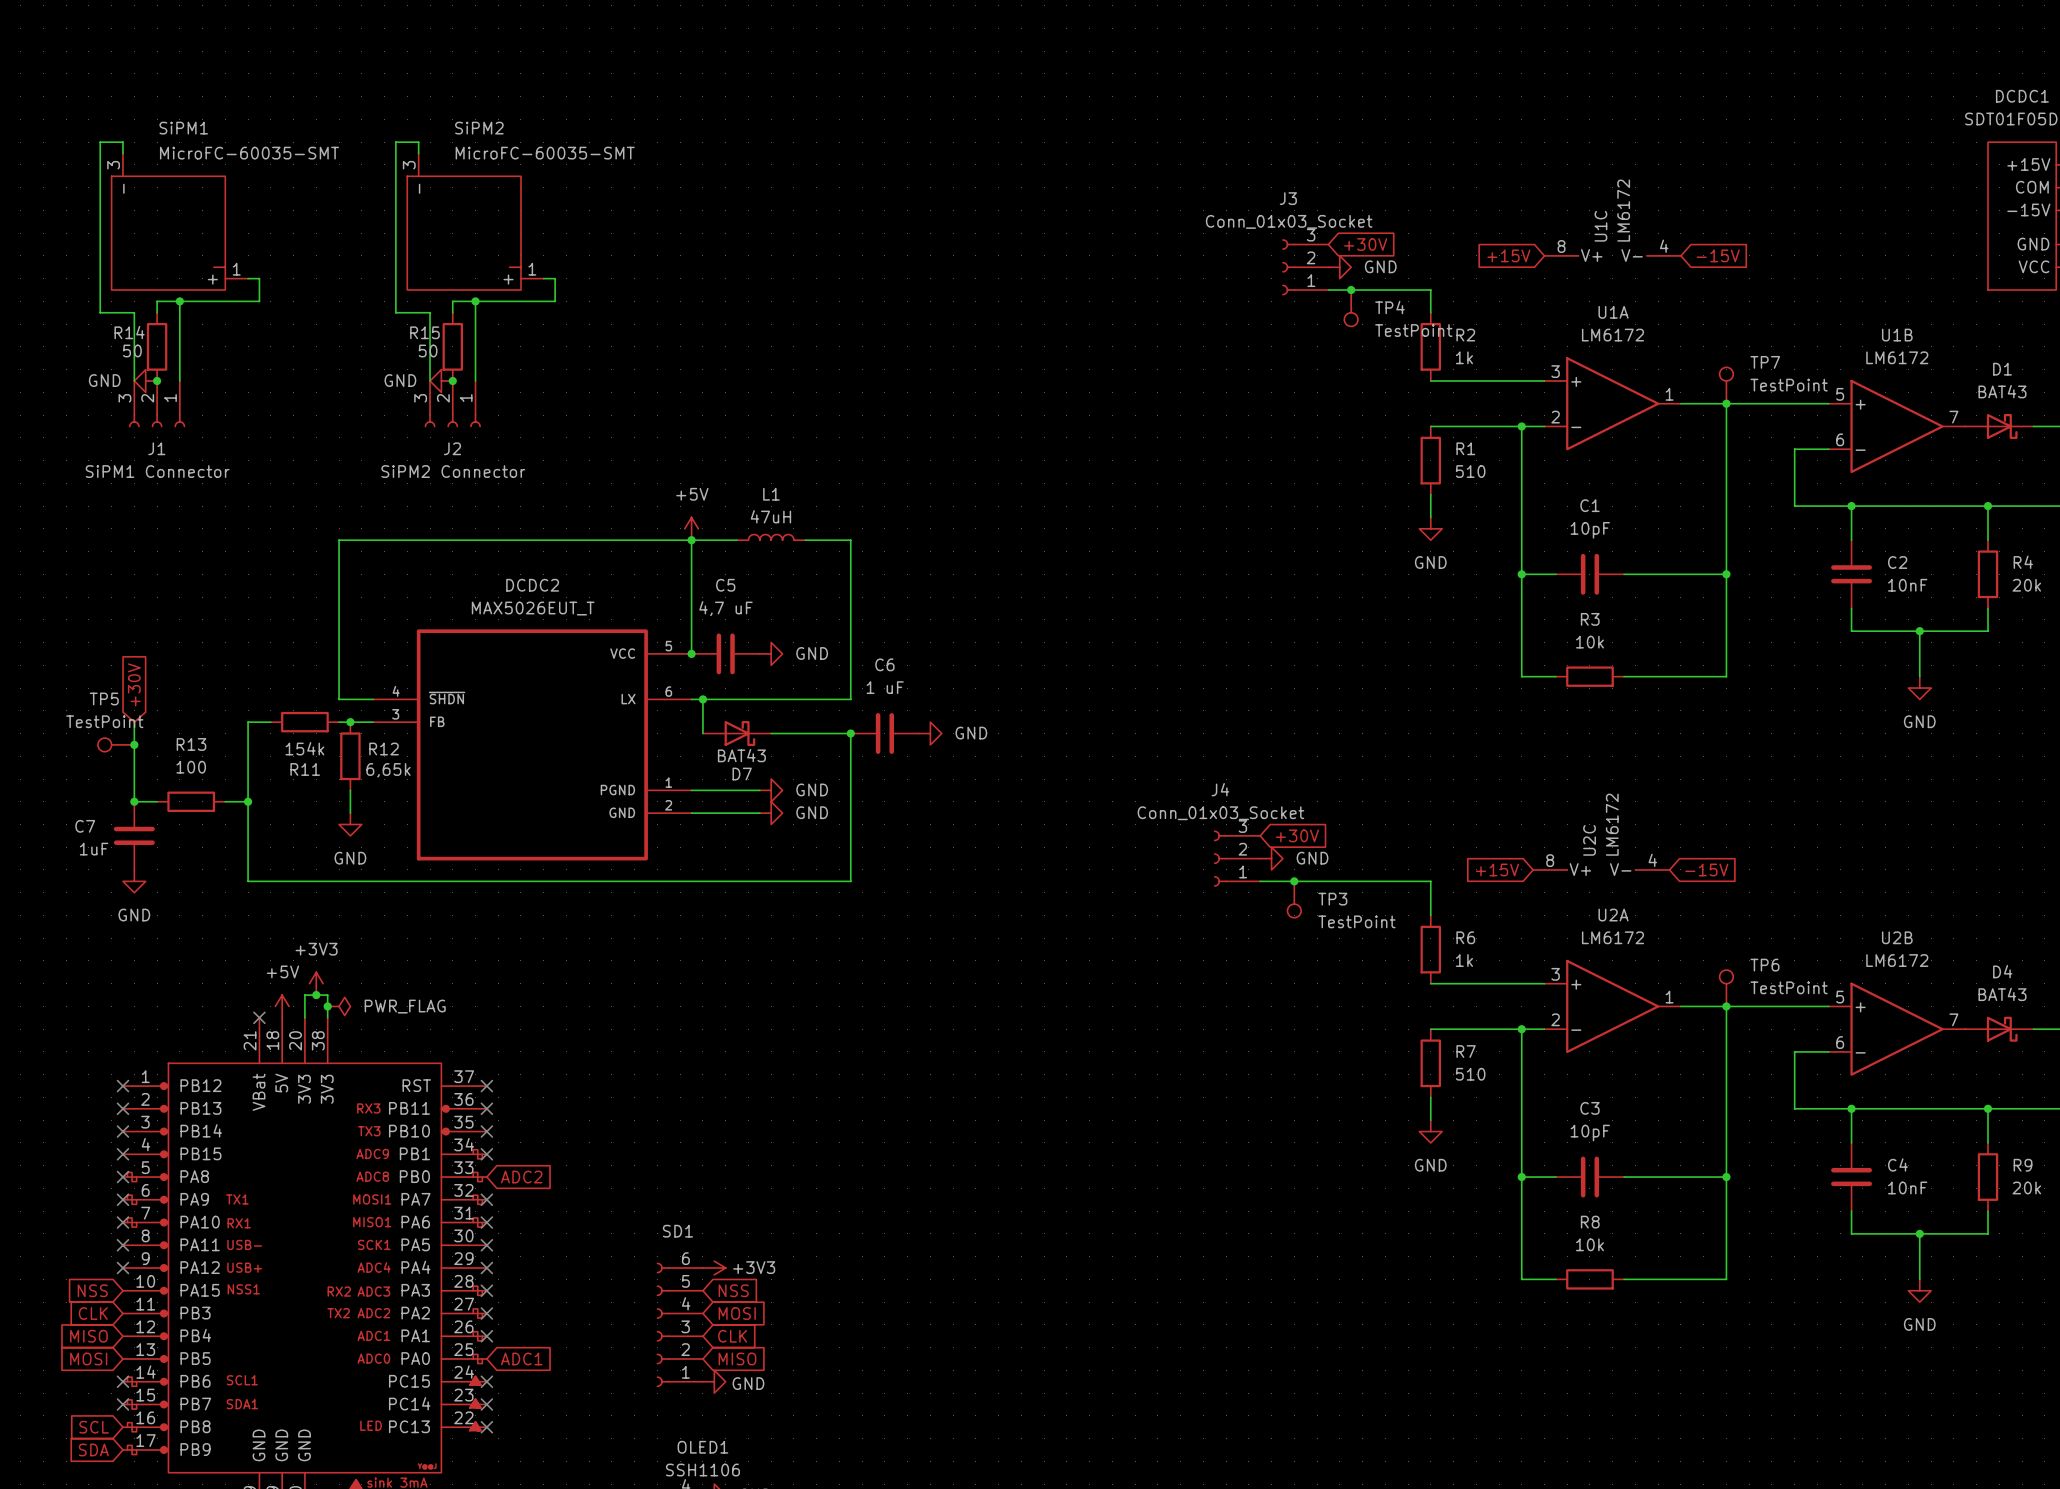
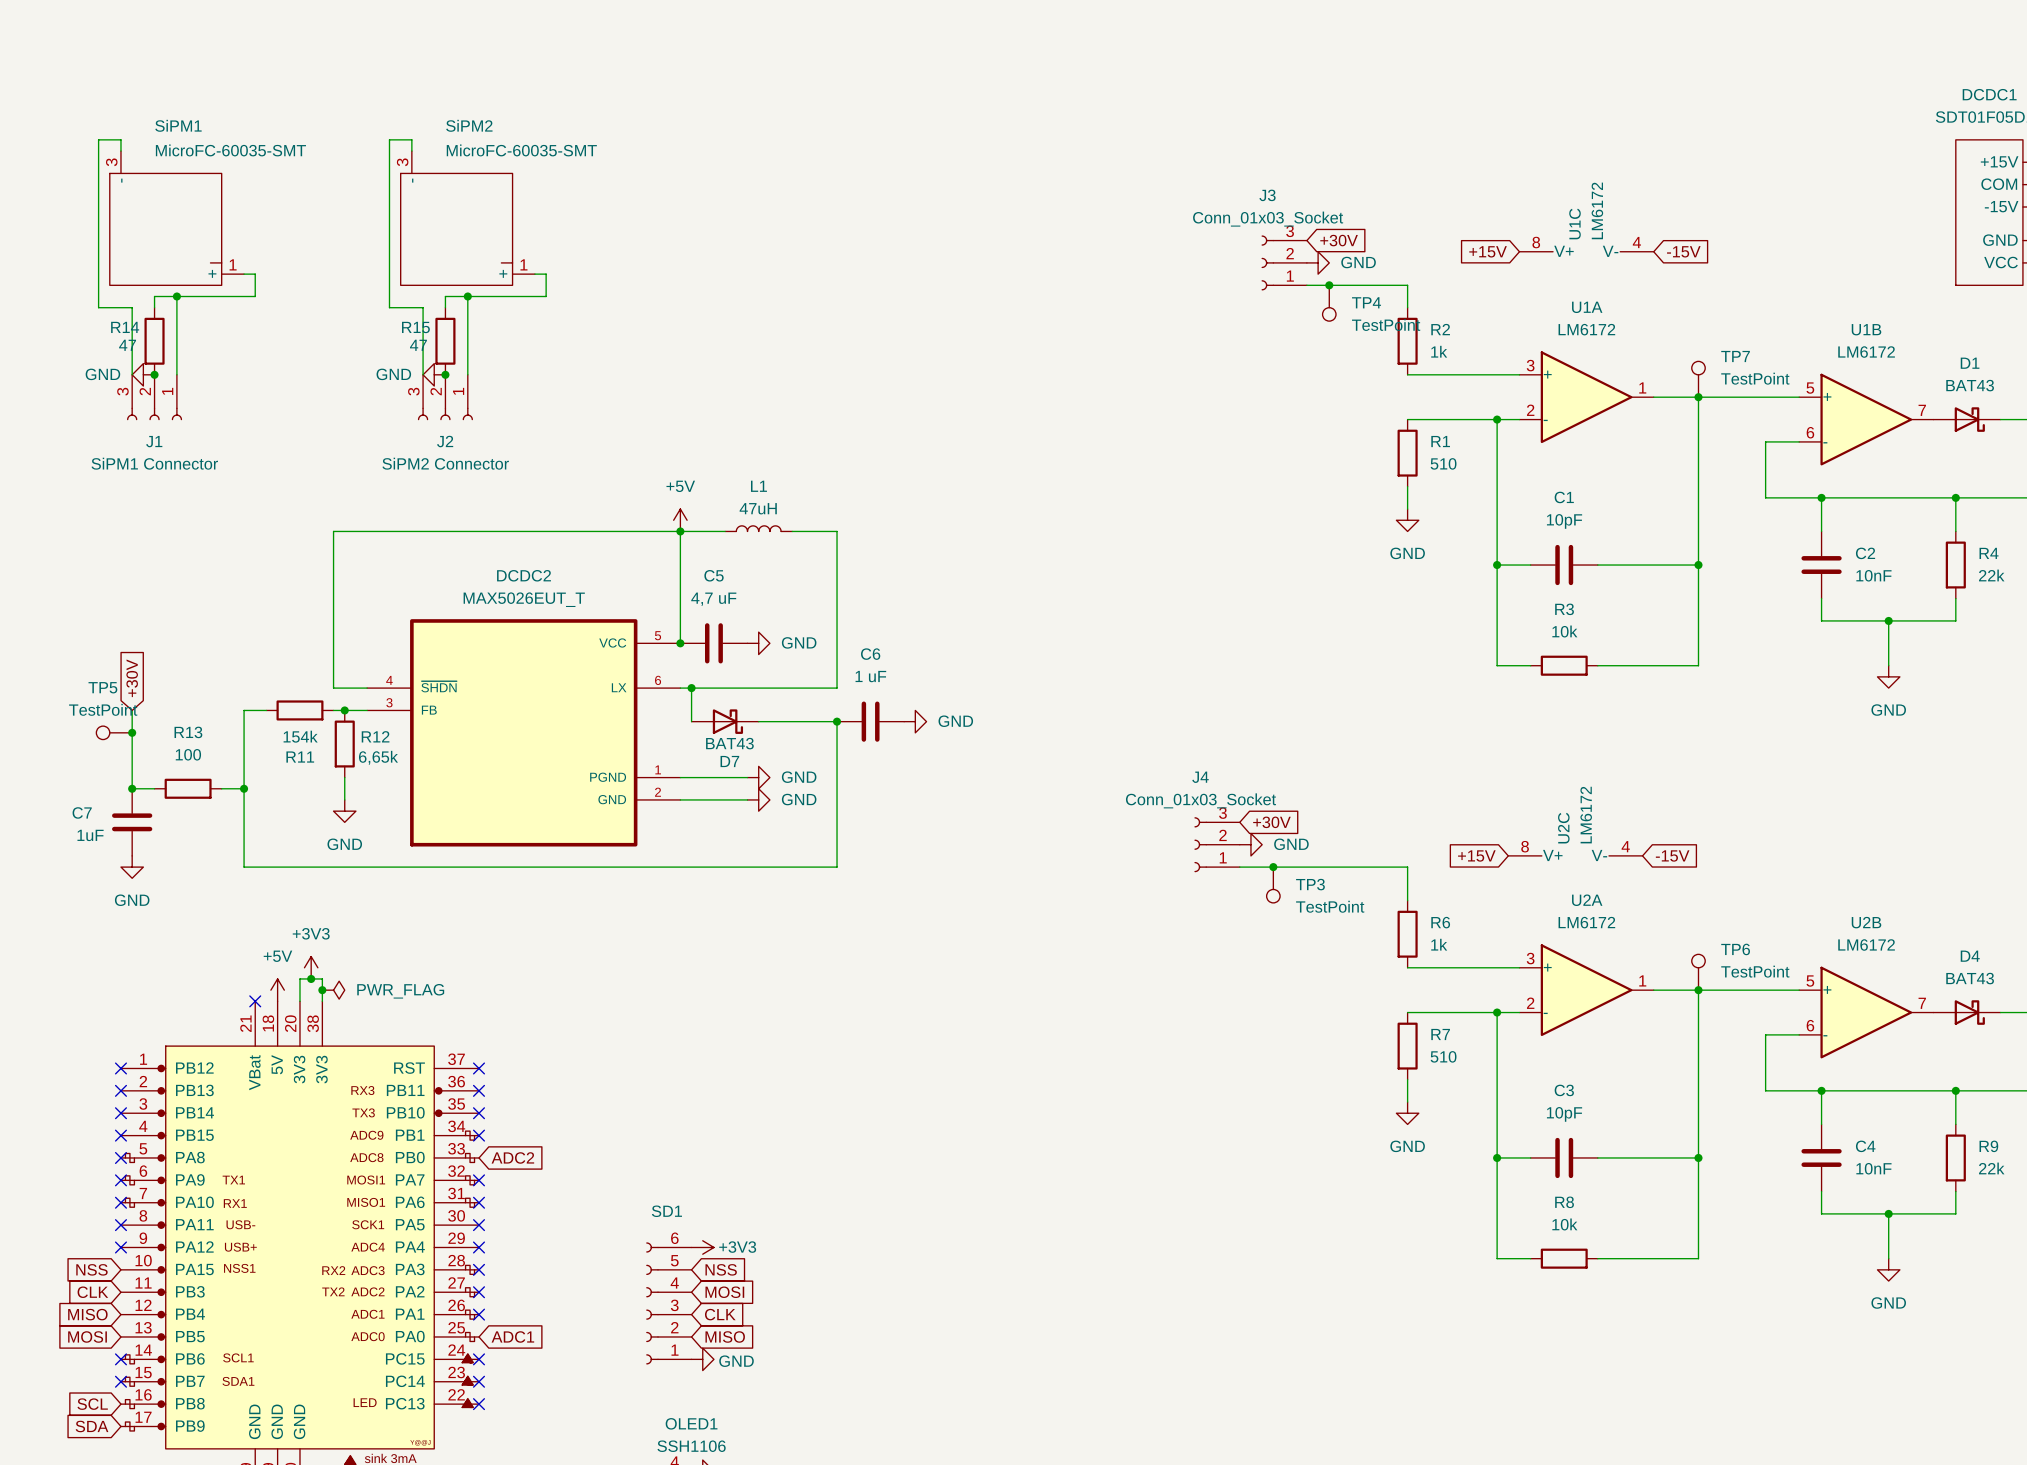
R14 value: 50 (132, 350) -> 47 (127, 345)
R15 value: 50 (428, 350) -> 47 (418, 345)
R4 value: 20k (2026, 585) -> 22k (1991, 575)
R9 value: 20k (2026, 1187) -> 22k (1991, 1168)

